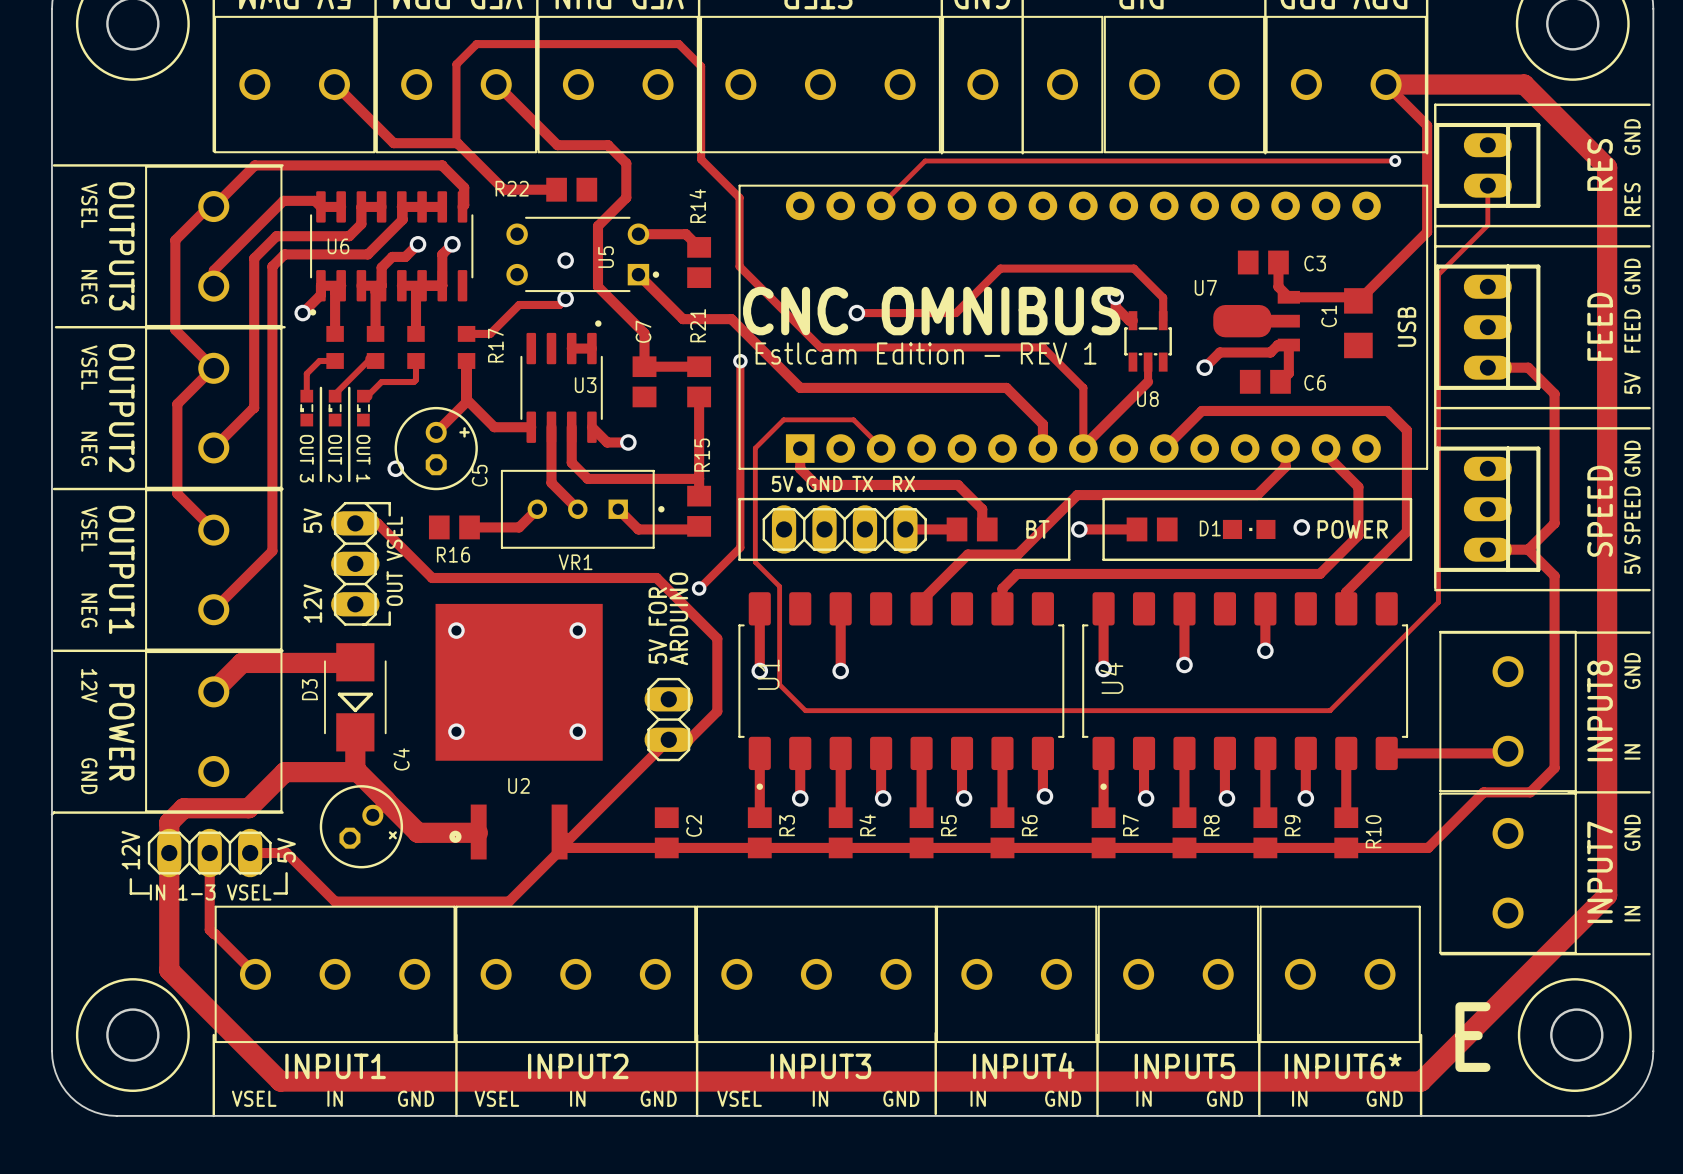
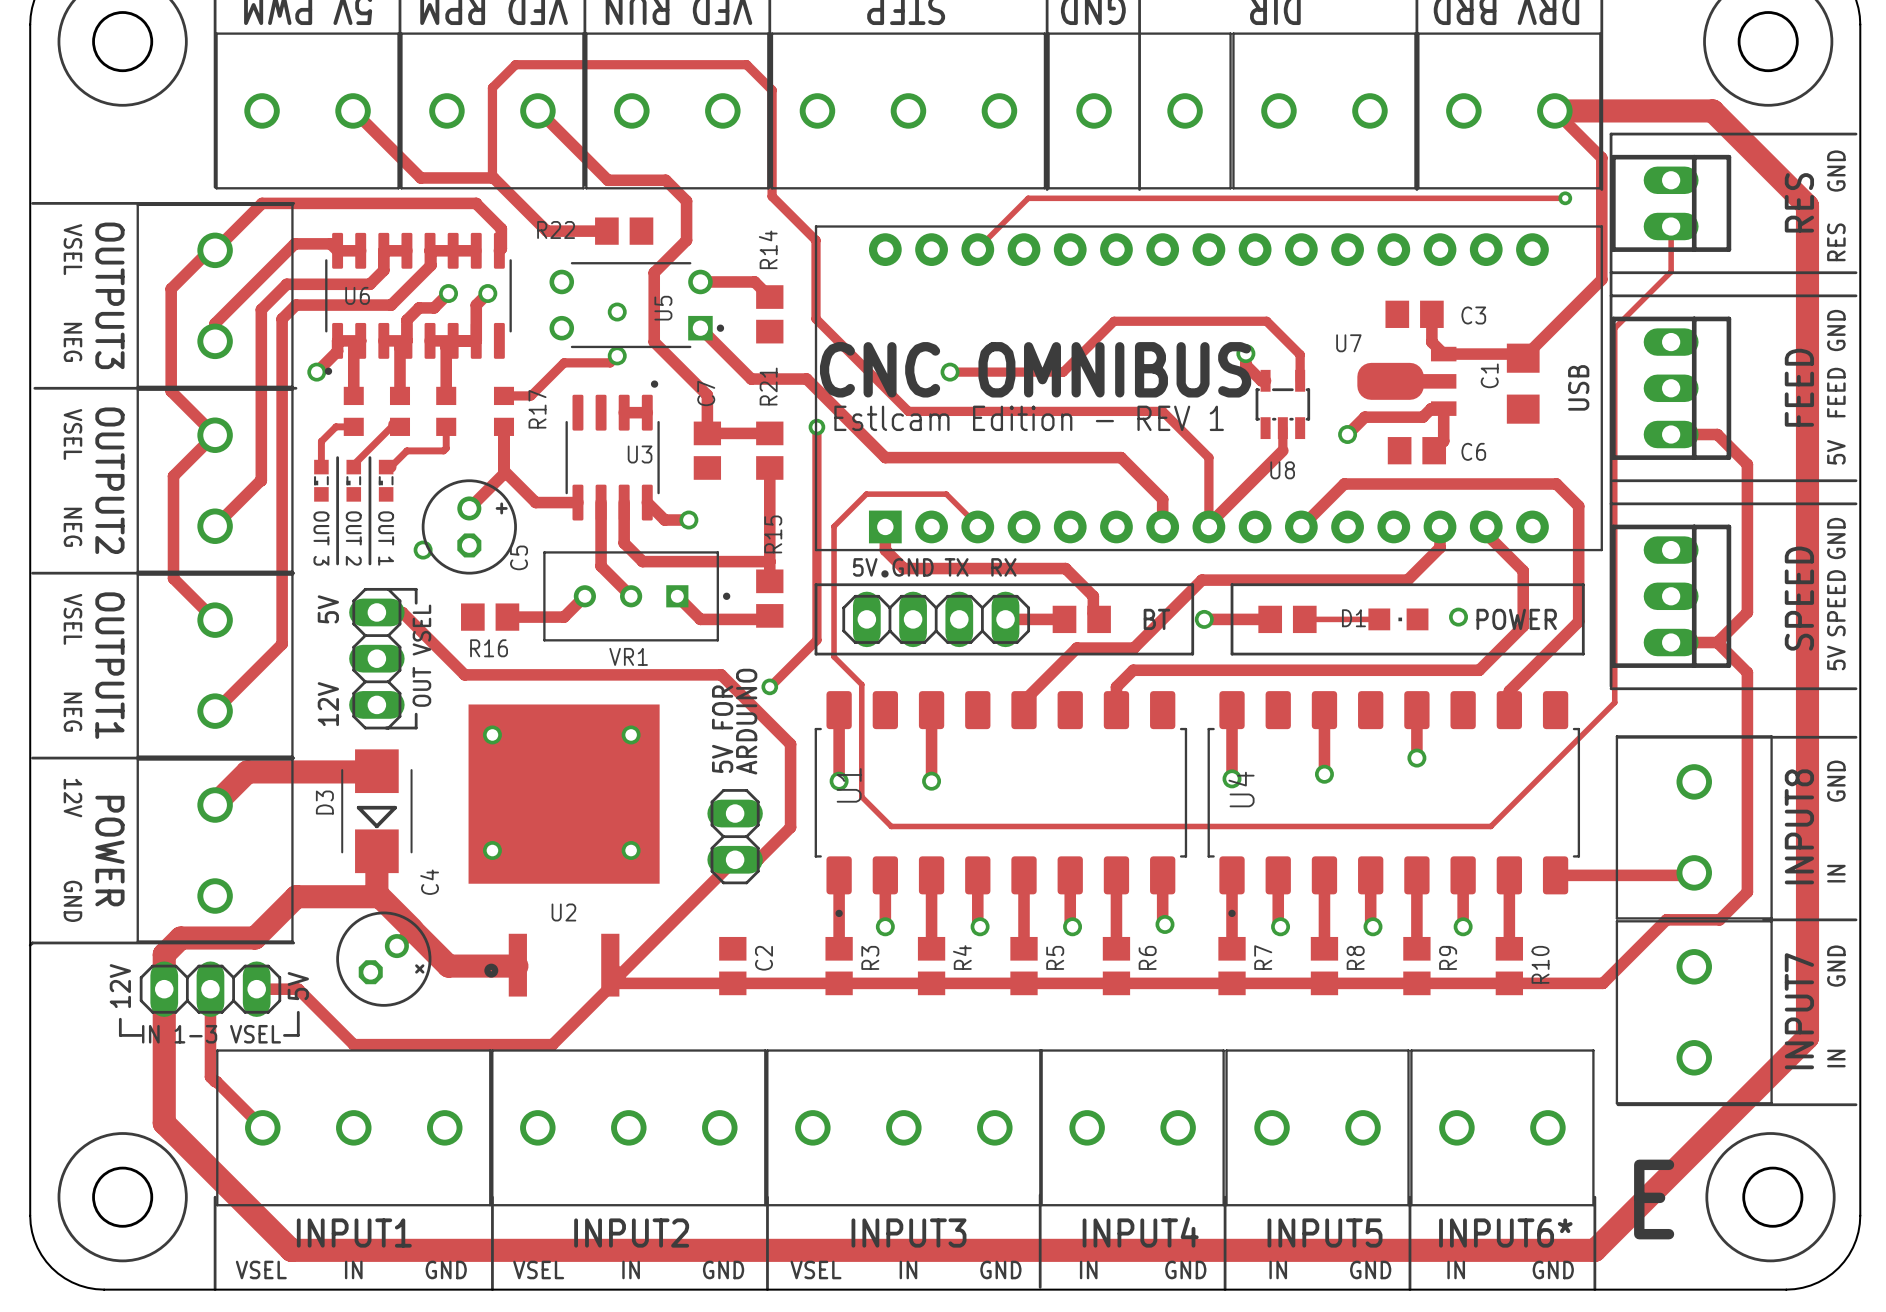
track: none -> (1304, 619) (1379, 619)

